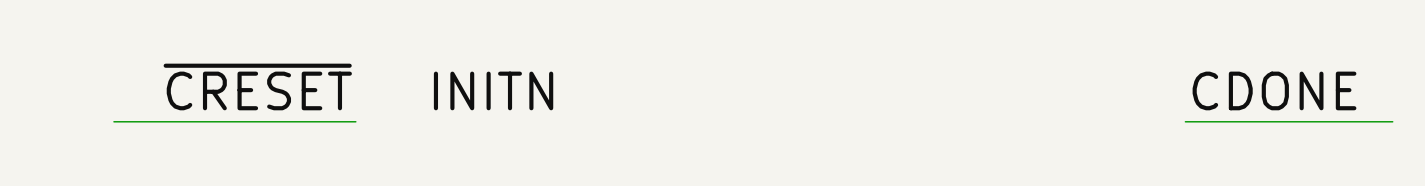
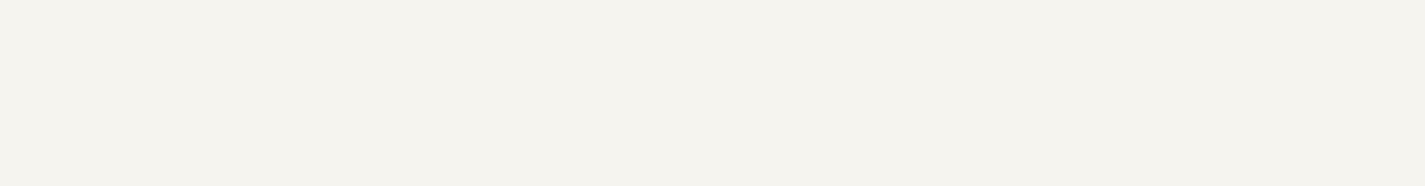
label: ~{CRESET} (257, 86) -> none
label: INITN (493, 90) -> none
label: CDONE (1274, 90) -> none
wire: (113, 121) (355, 121) -> none
wire: (1185, 121) (1392, 121) -> none

